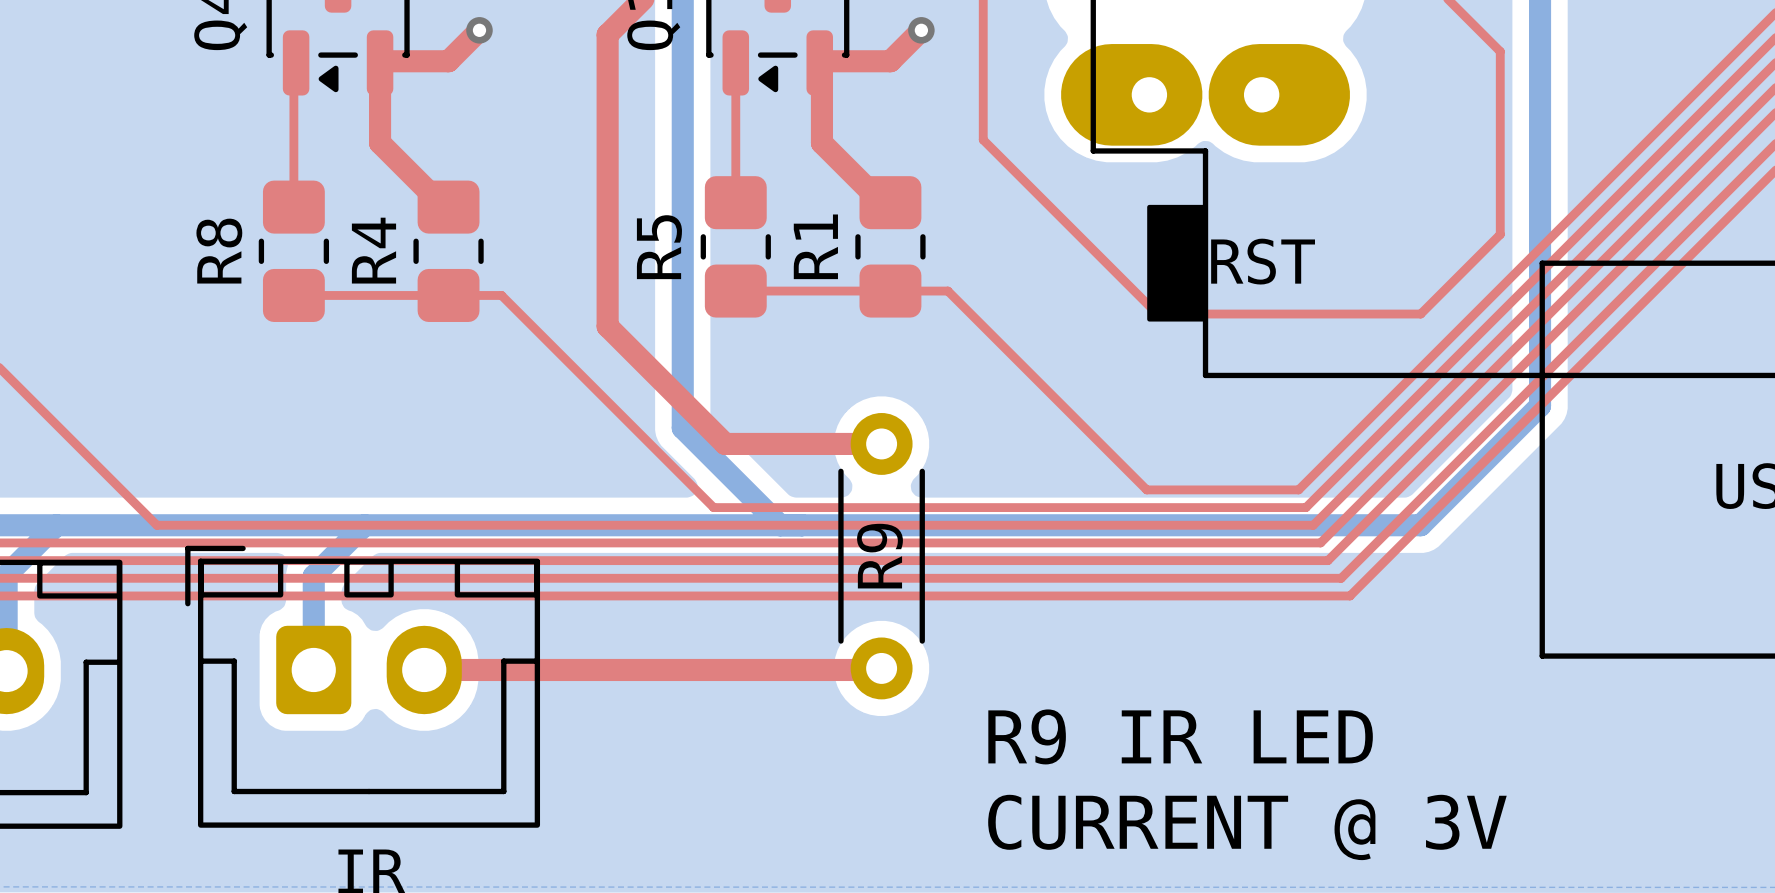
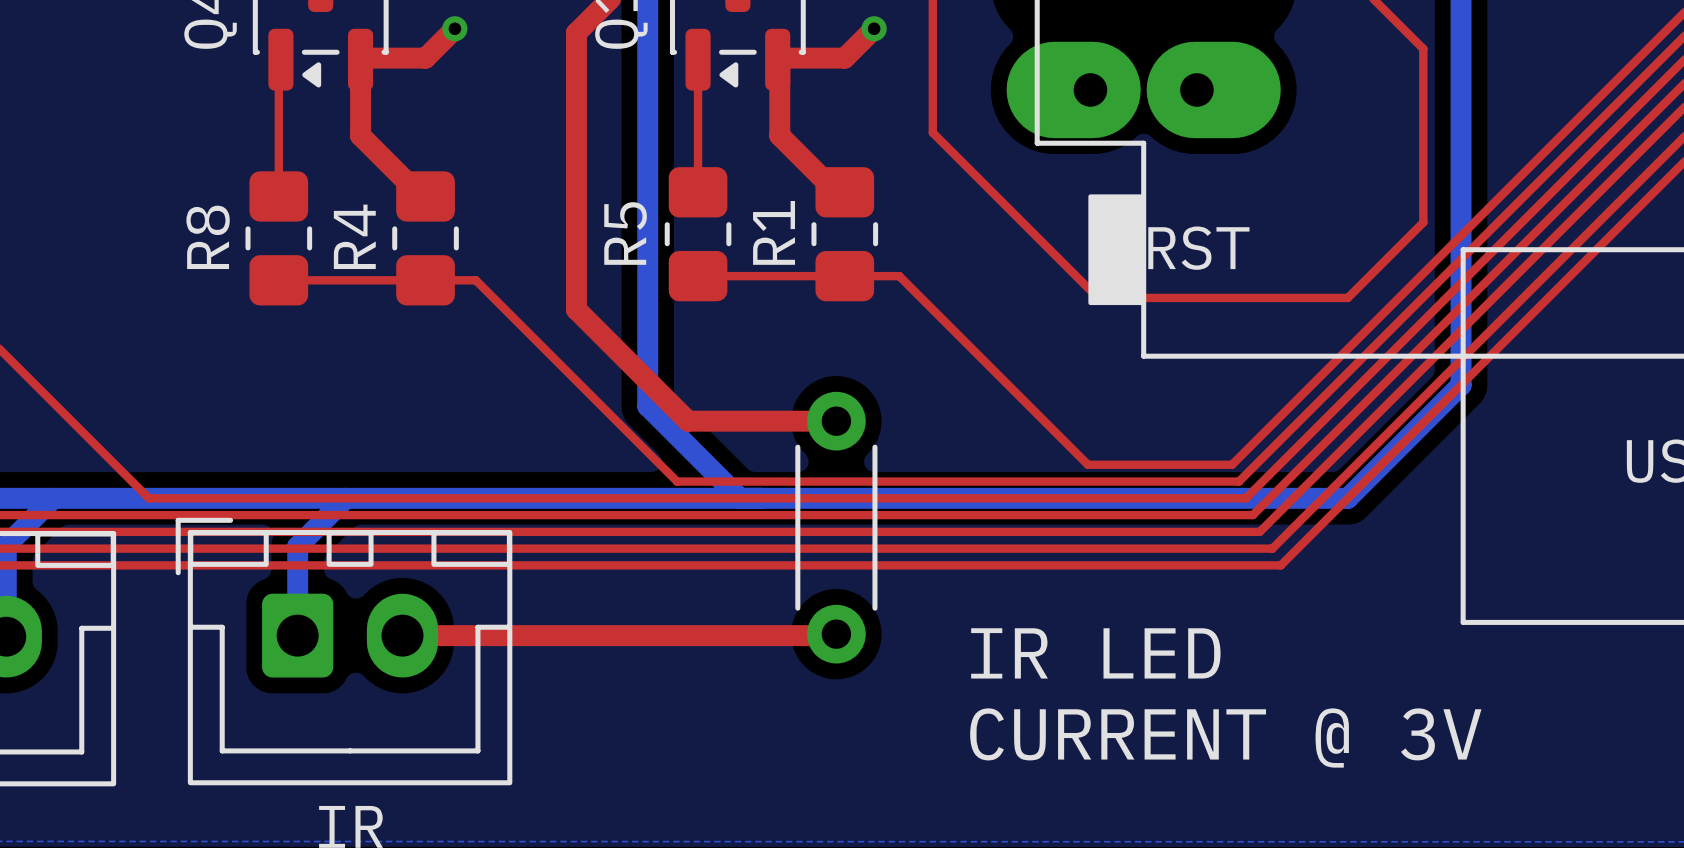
R9 name: R9 (879, 556) -> none
text: R9 IR LED (1180, 736) -> IR LED (1095, 653)
text position: CURRENT @ 3V (1247, 827) -> CURRENT @ 3V (1225, 738)

